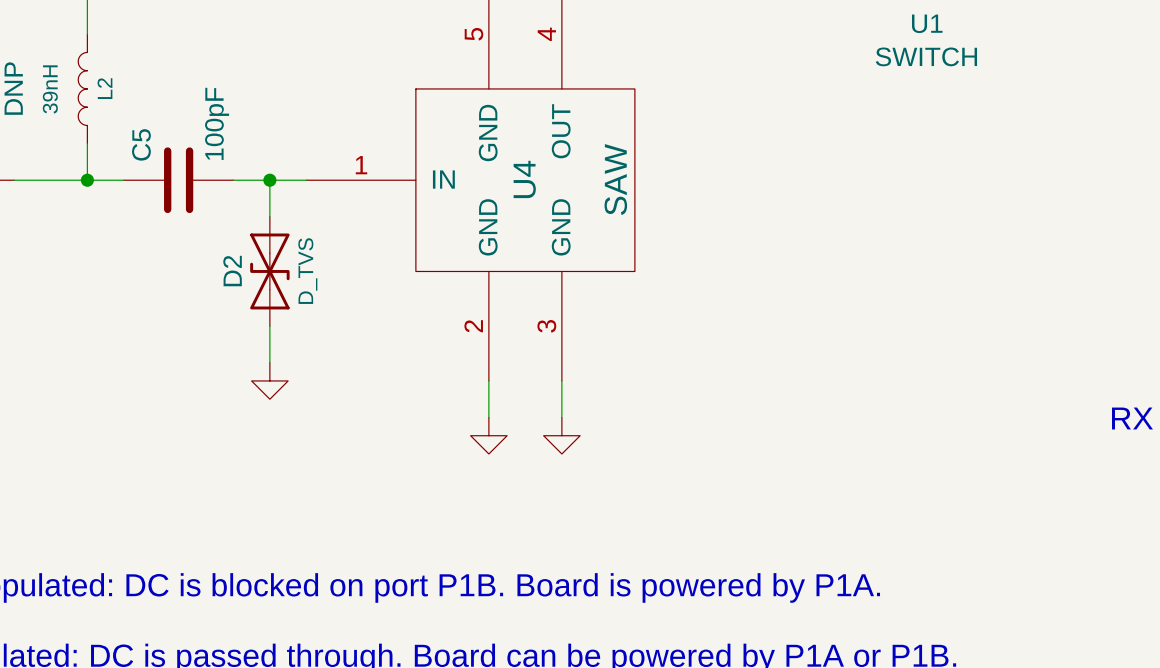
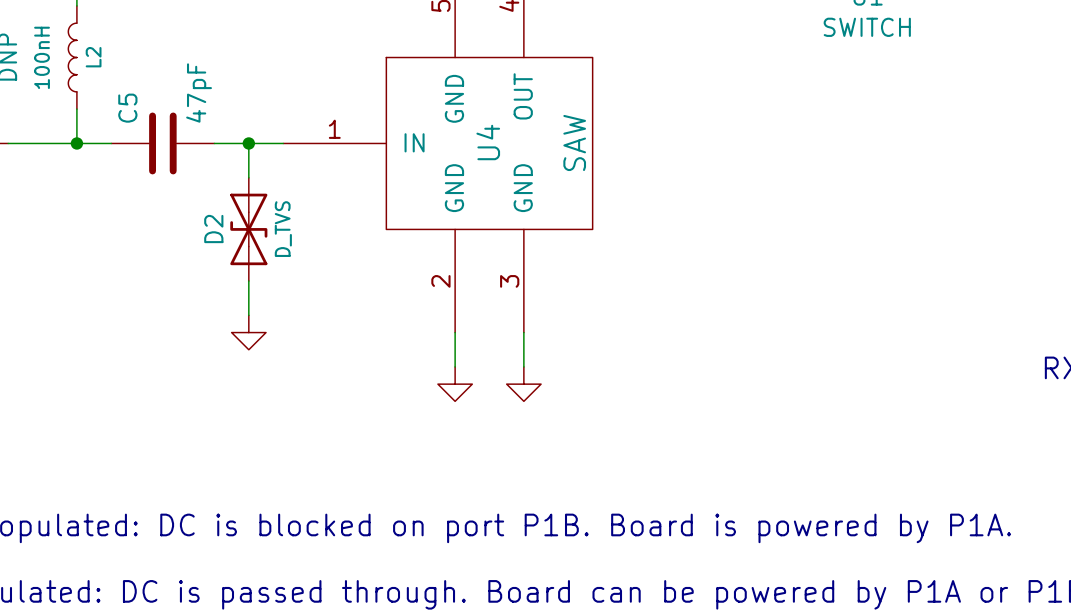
L2 value: 39nH (50, 89) -> 100nH (42, 57)
C5 value: 100pF (217, 123) -> 47pF (199, 93)

